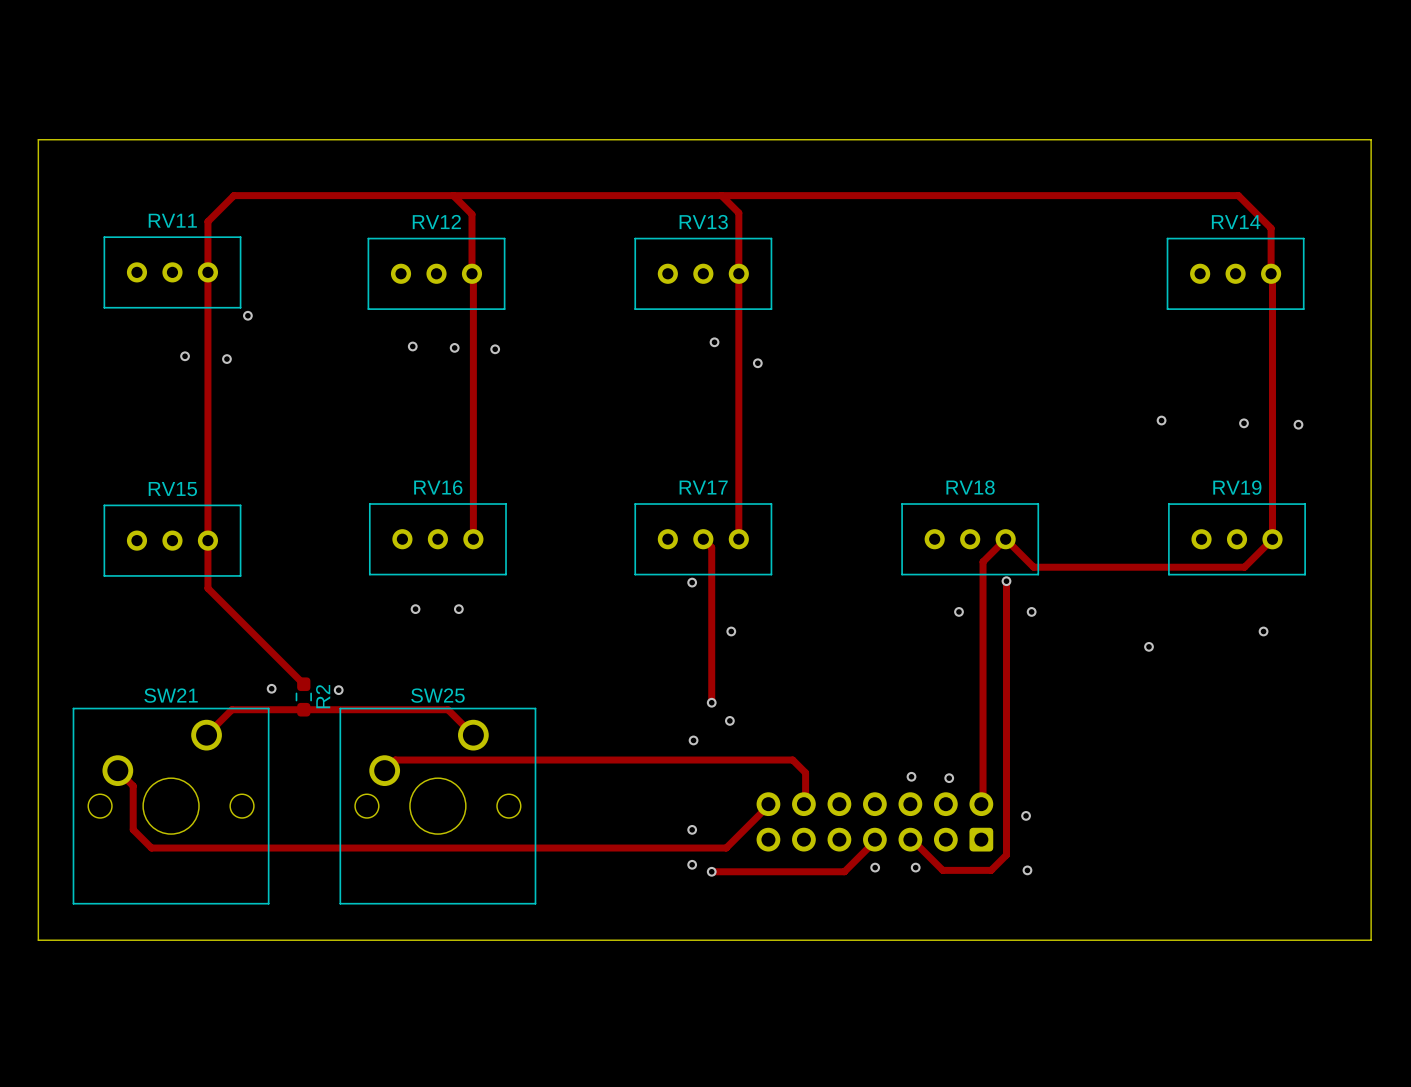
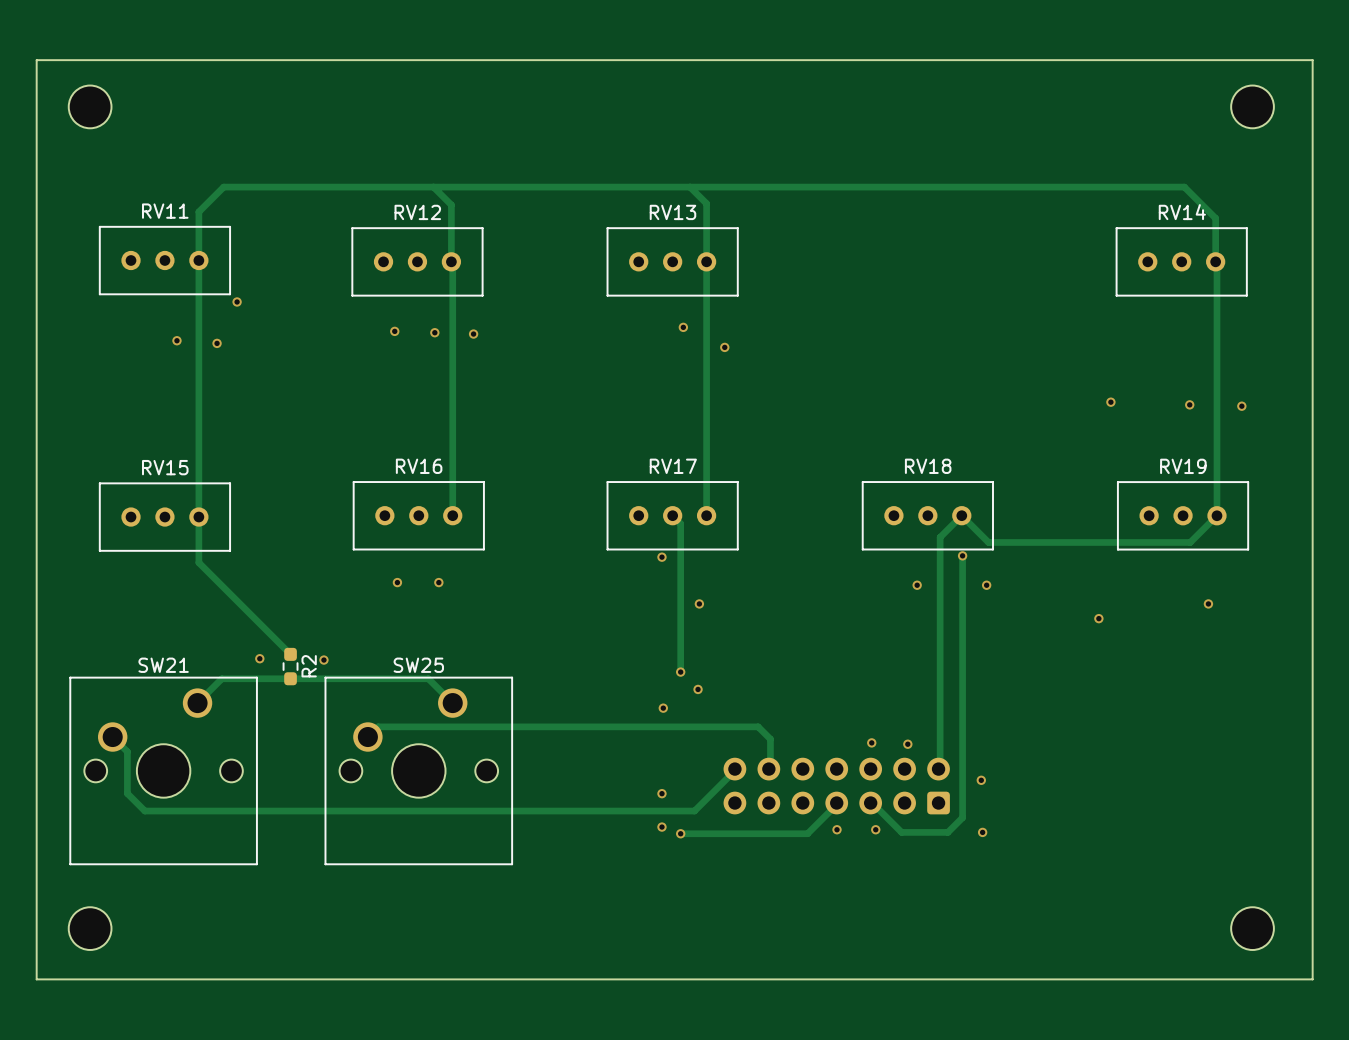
part: none -> (90, 106)
part: none -> (1252, 106)
board edge: (38, 139) (1371, 139) (1371, 940) (38, 940) -> (36, 133) (36, 60) (1312, 60) (1312, 979) (36, 979) (36, 899)
part: none -> (90, 928)
part: none -> (1252, 928)

